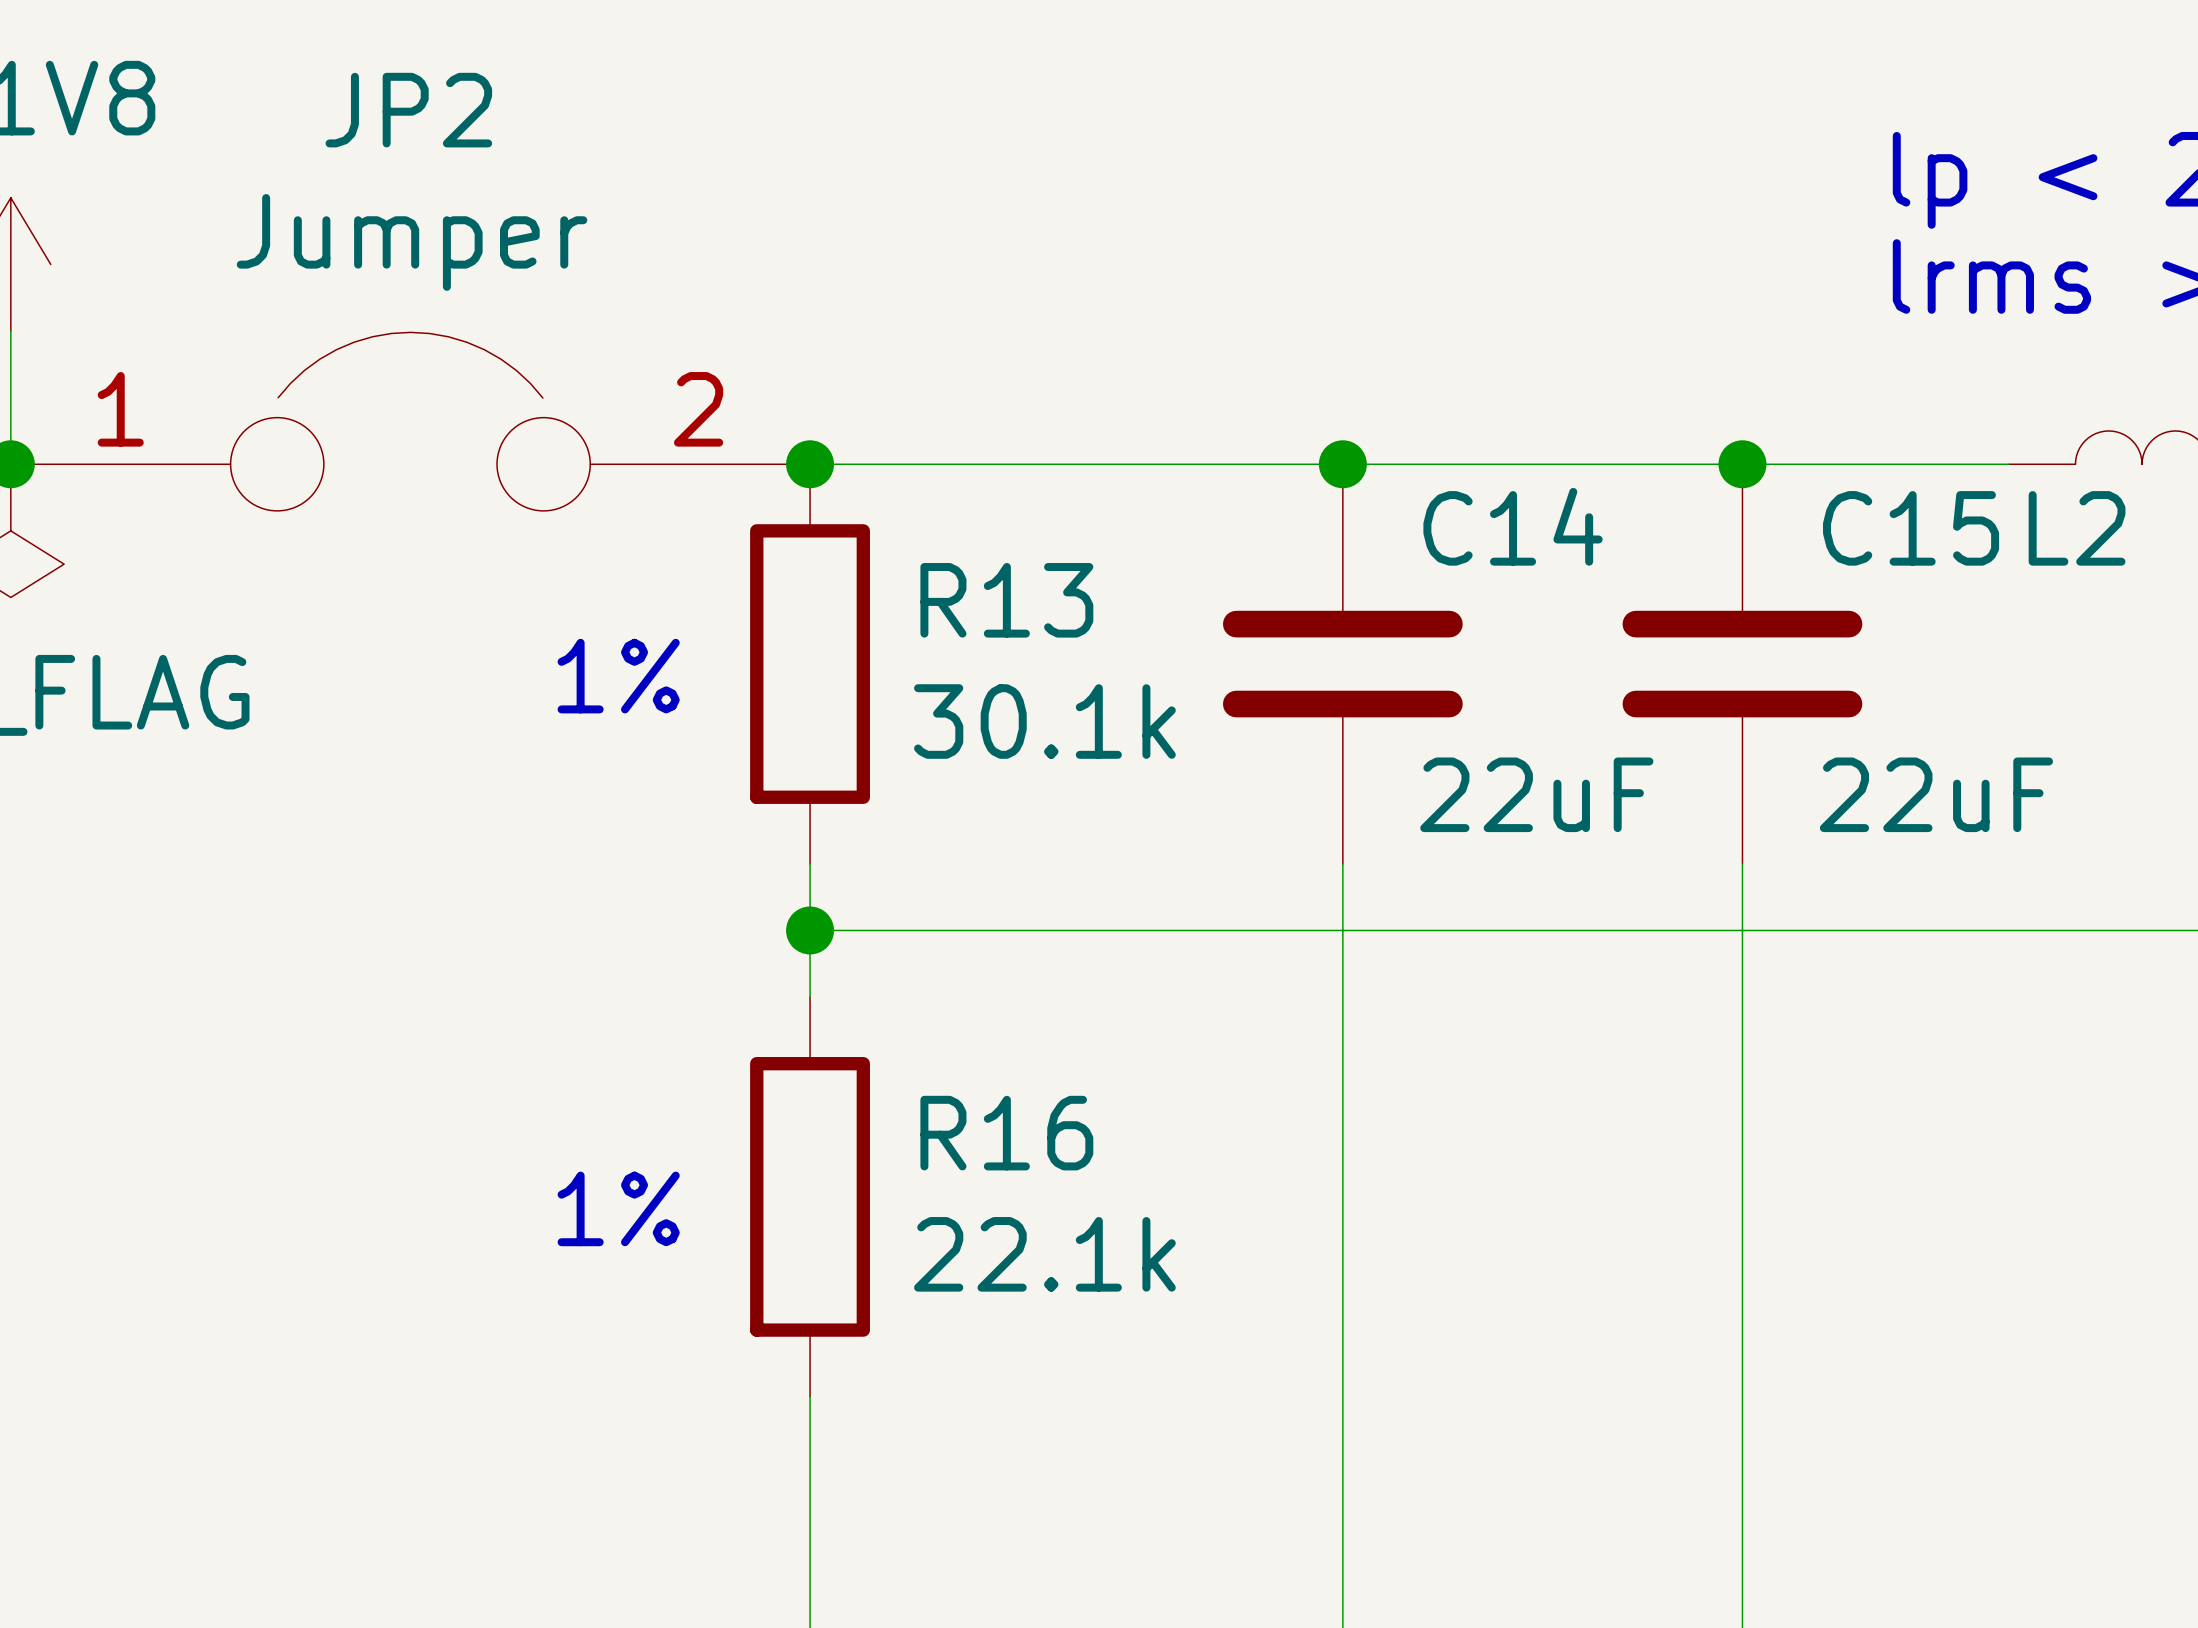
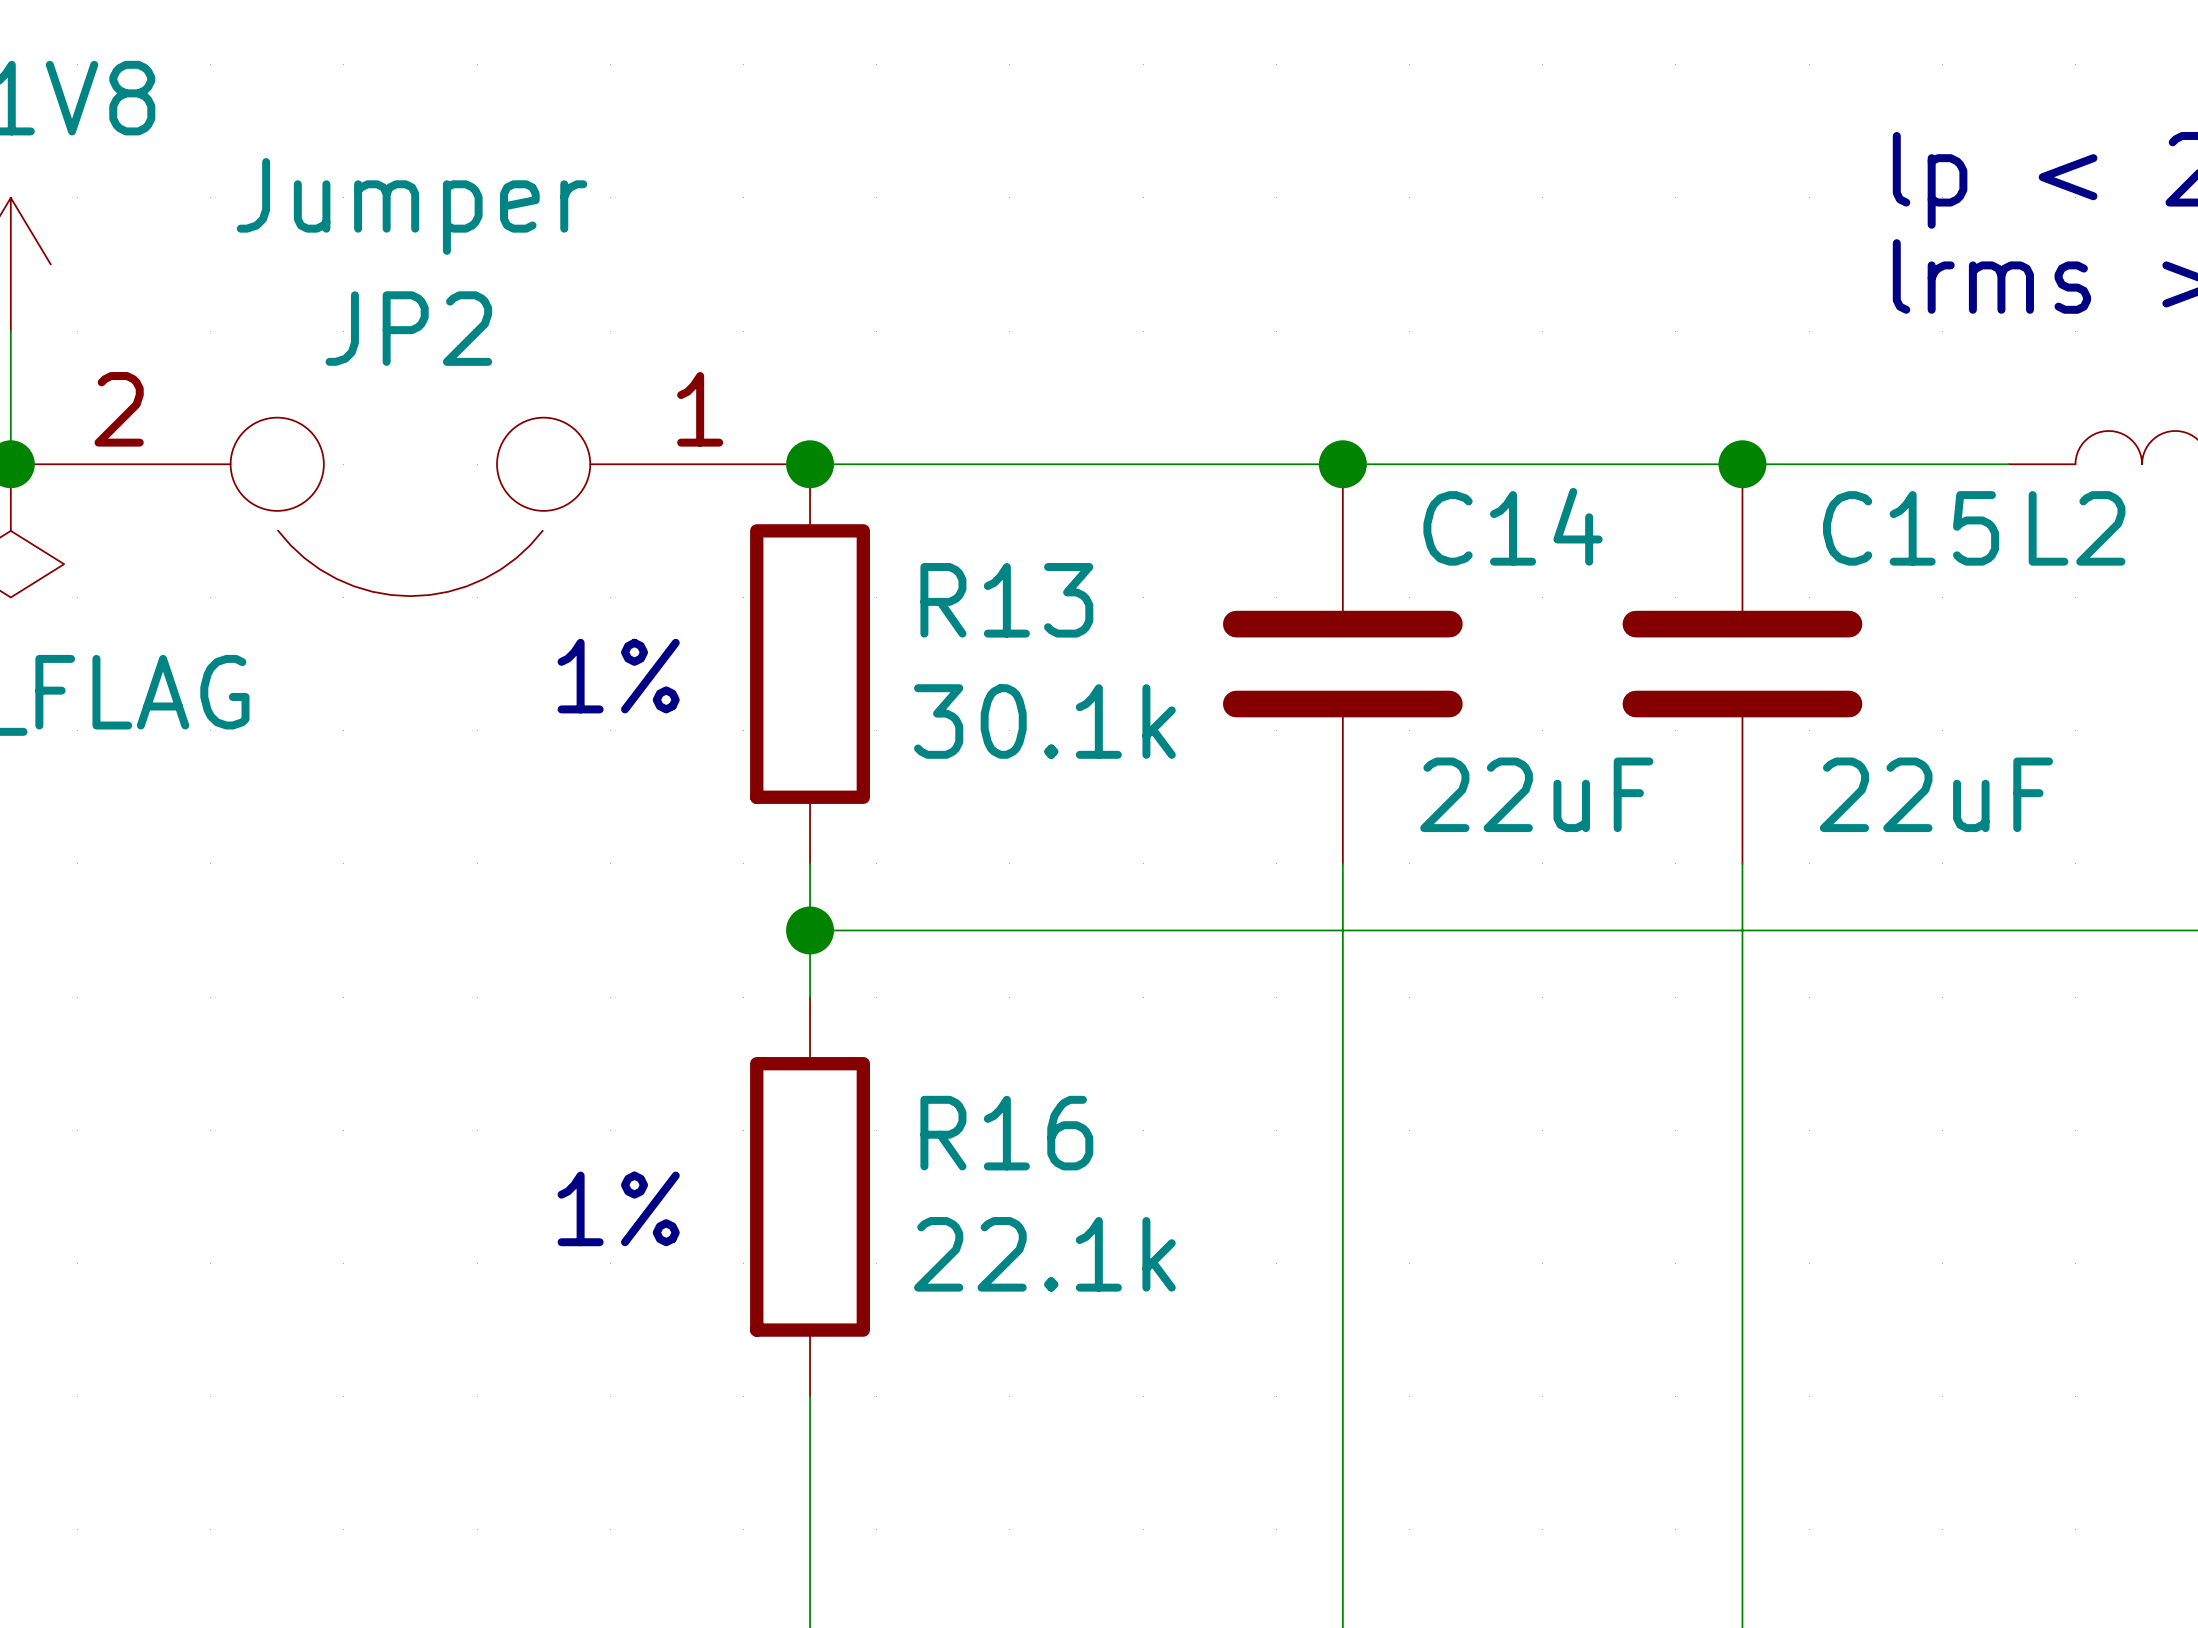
JP2 name position: JP2 (408, 110) -> JP2 (408, 328)
JP2 value position: Jumper (412, 242) -> Jumper (412, 206)
JP2 rotation: 0° (410, 421) -> 180° (410, 506)

